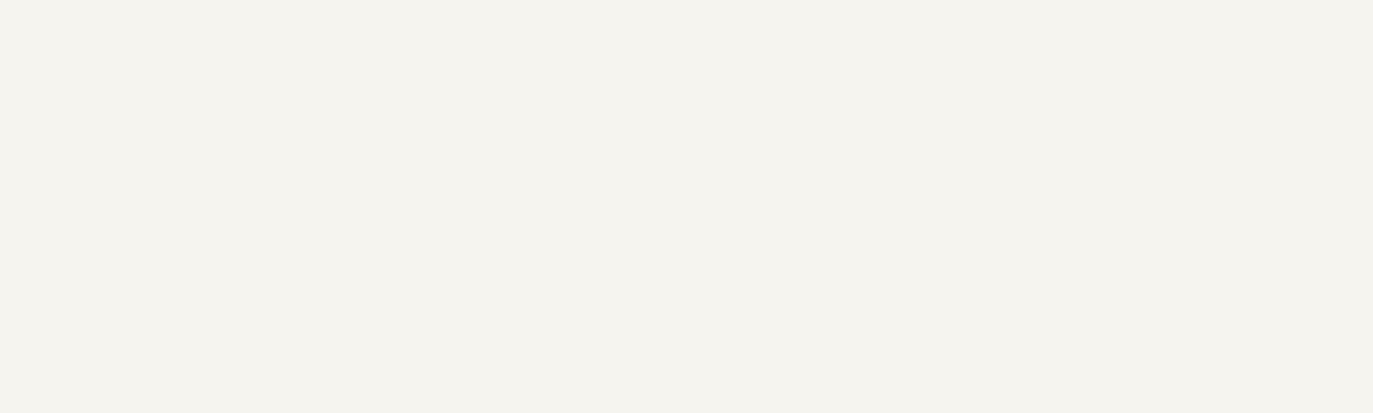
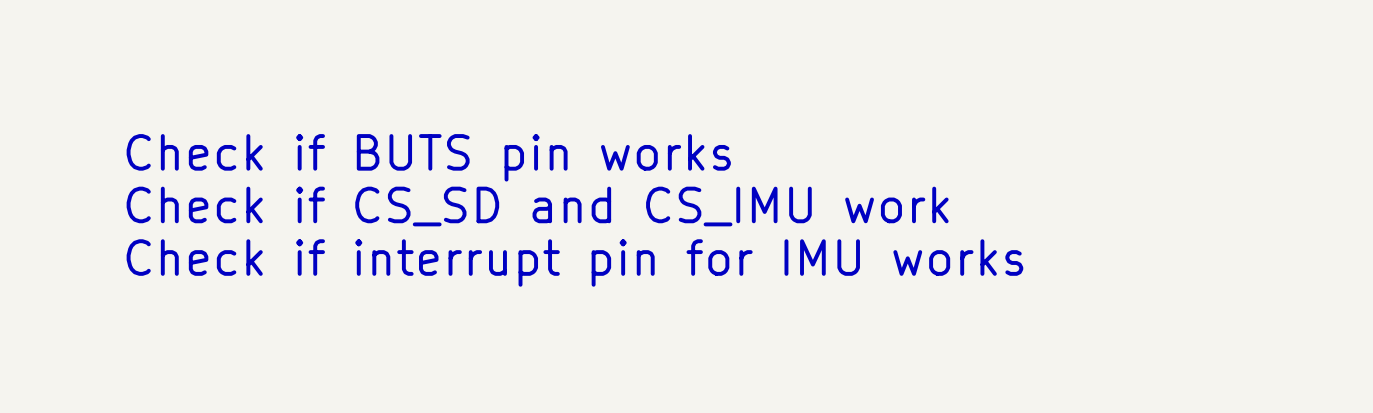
text: none -> Check if BUTS pin works (428, 157)
text: none -> Check if CS_SD and CS_IMU work (537, 206)
text: none -> Check if interrupt pin for IMU works (574, 262)

